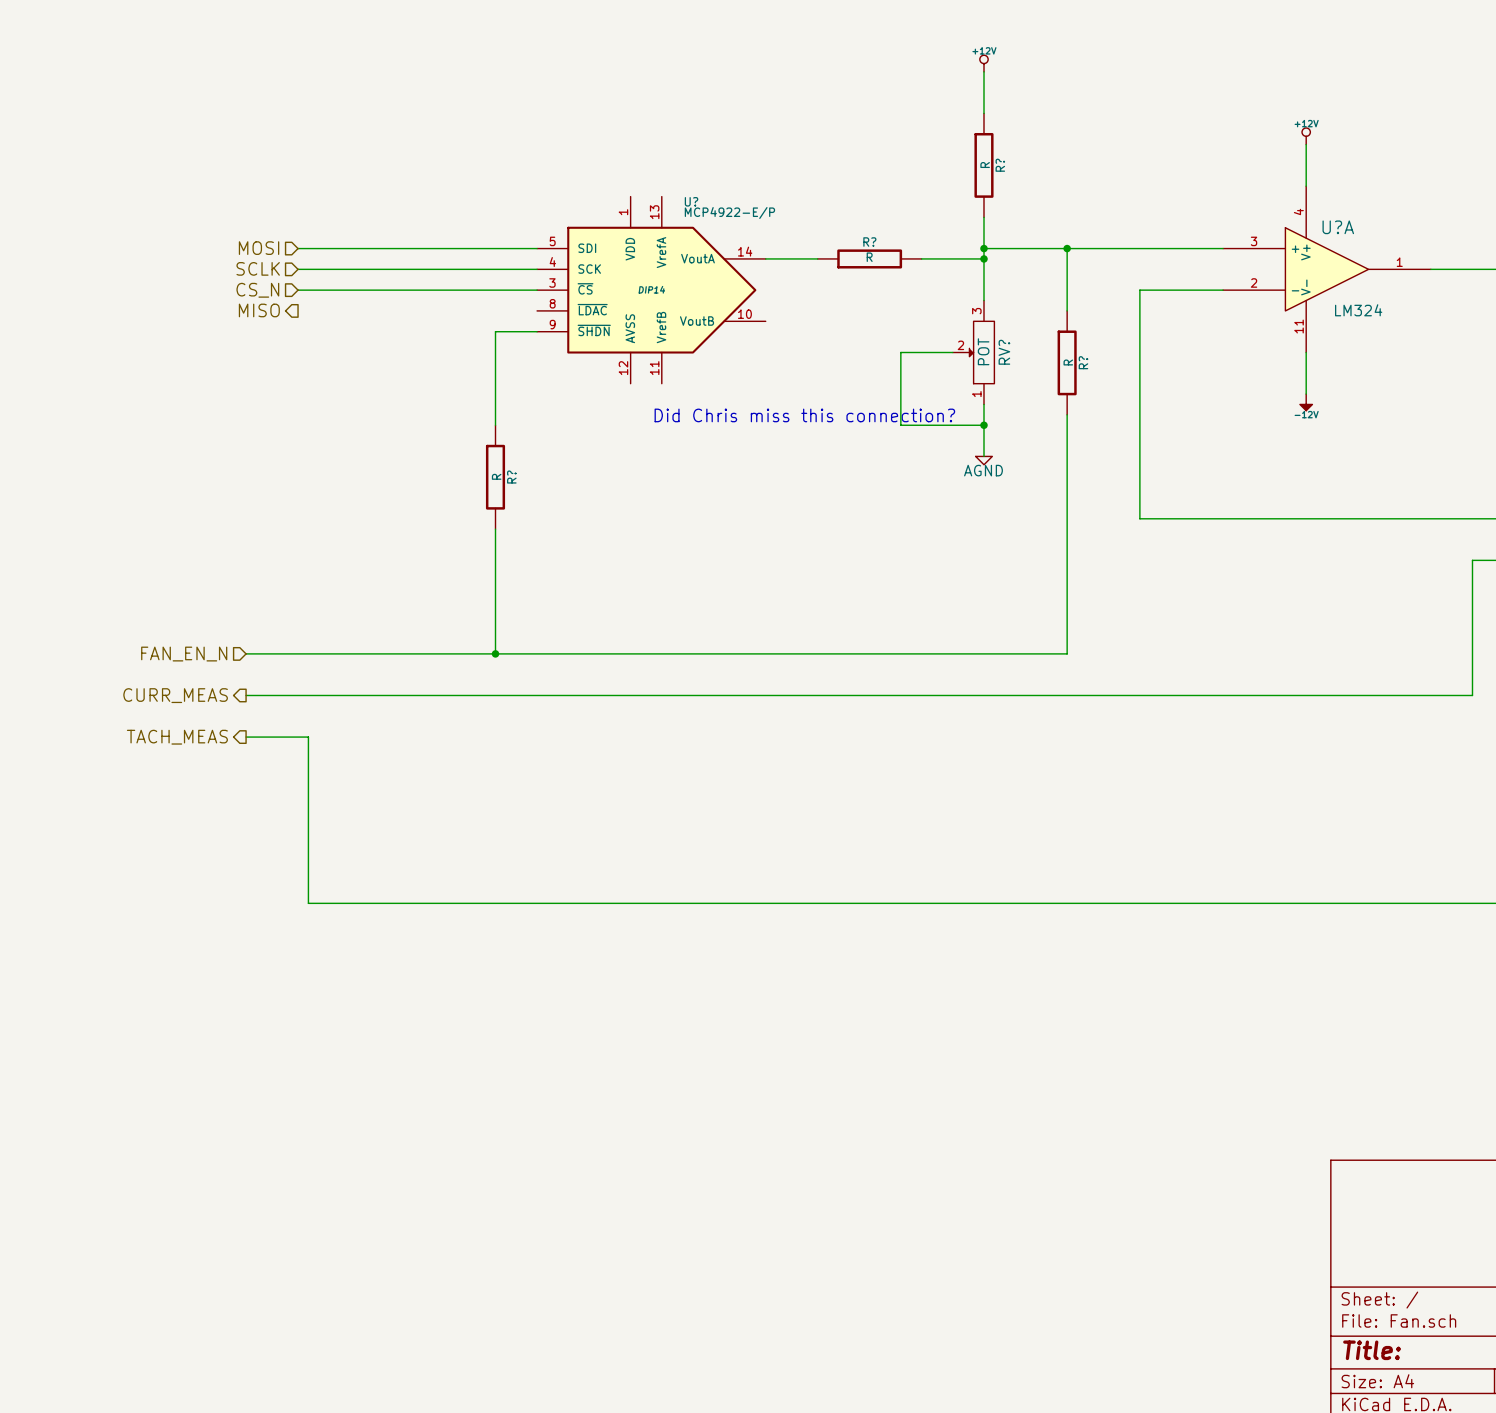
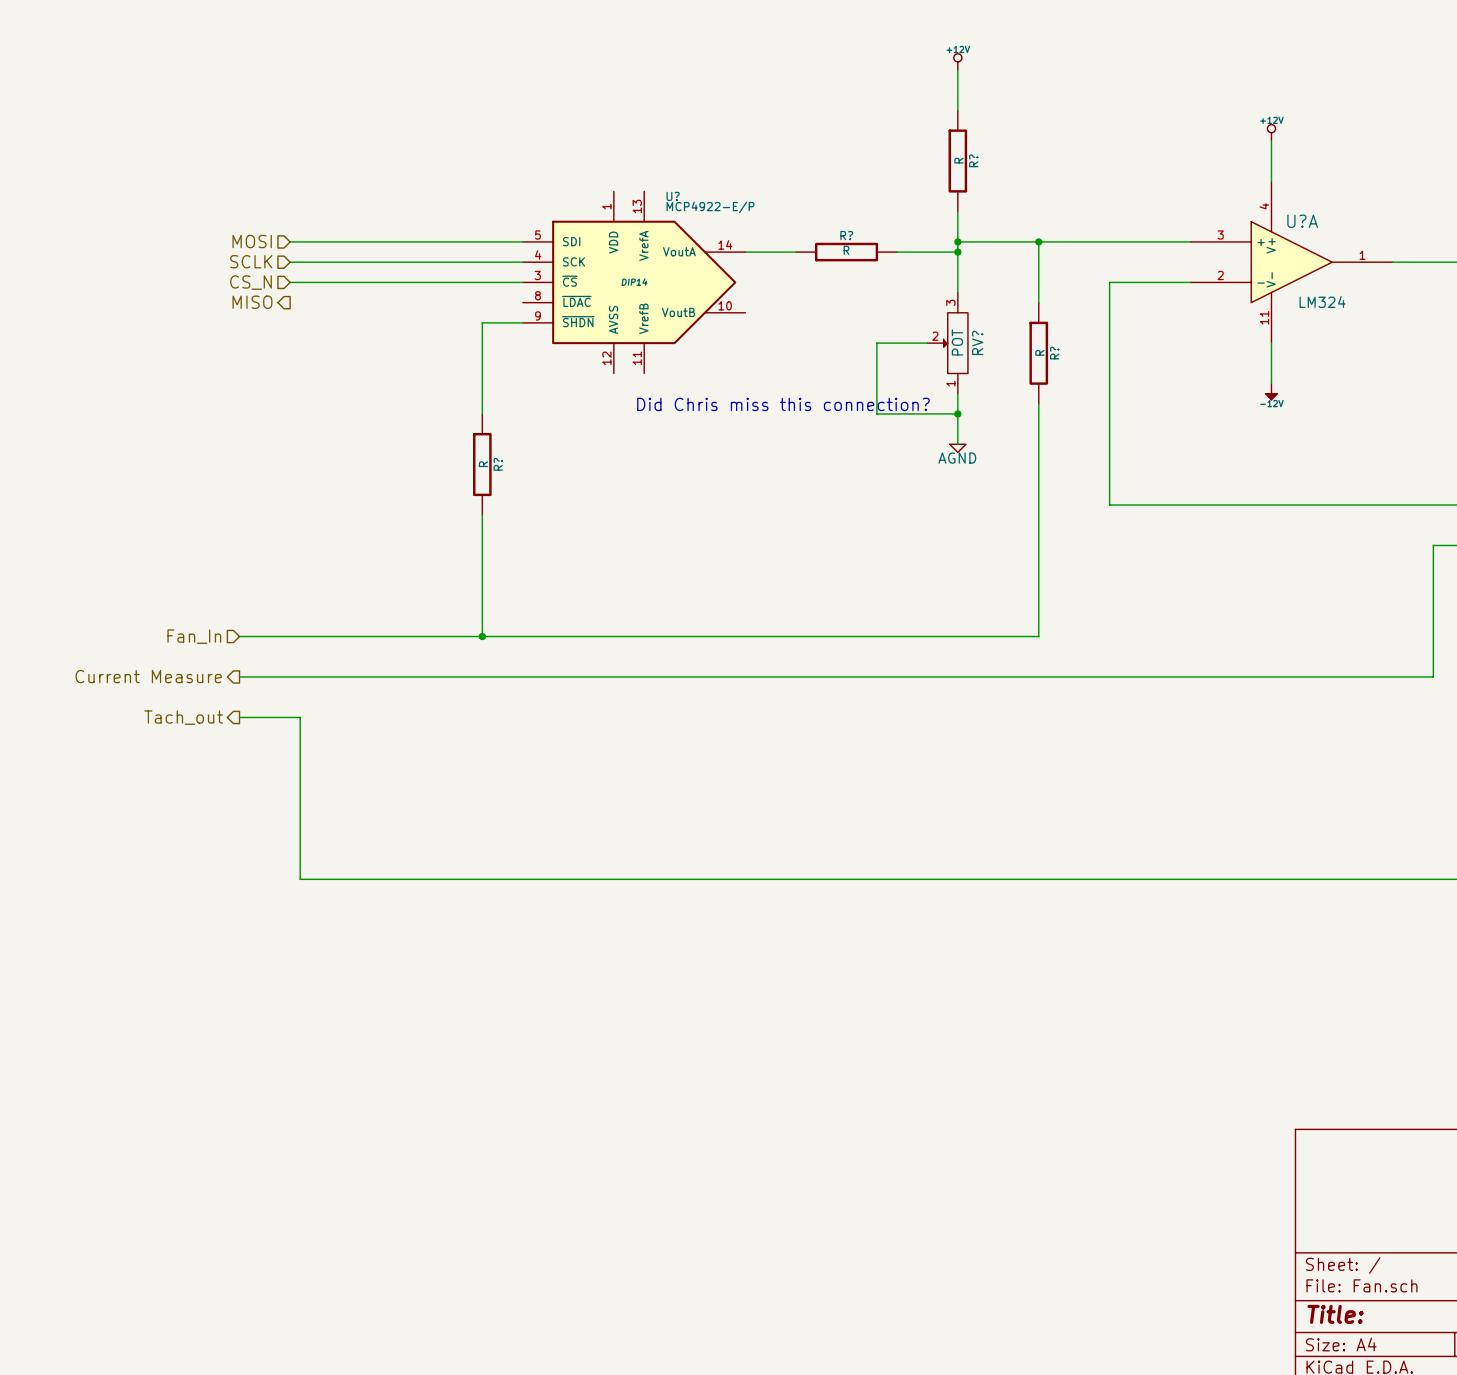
hierarchical label: FAN_EN_N (184, 654) -> Fan_In (194, 636)
hierarchical label: CURR_MEAS (175, 695) -> Current Measure (148, 676)
hierarchical label: TACH_MEAS (177, 737) -> Tach_out (183, 717)

